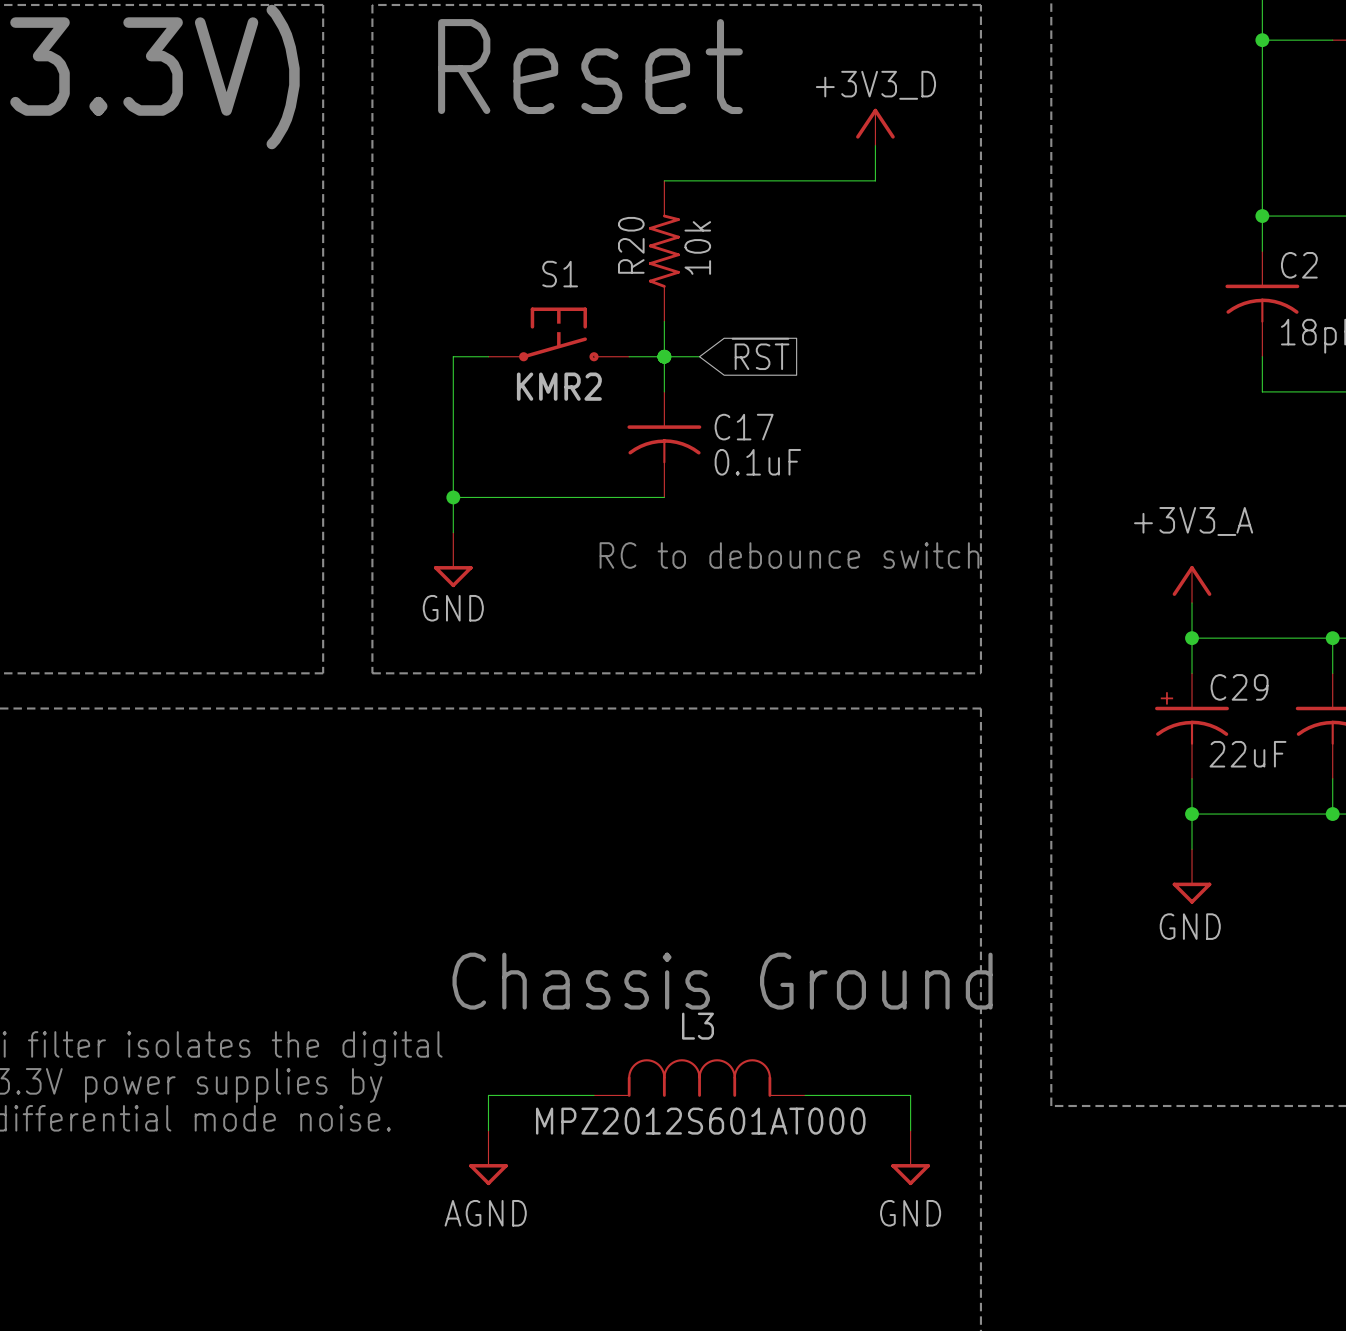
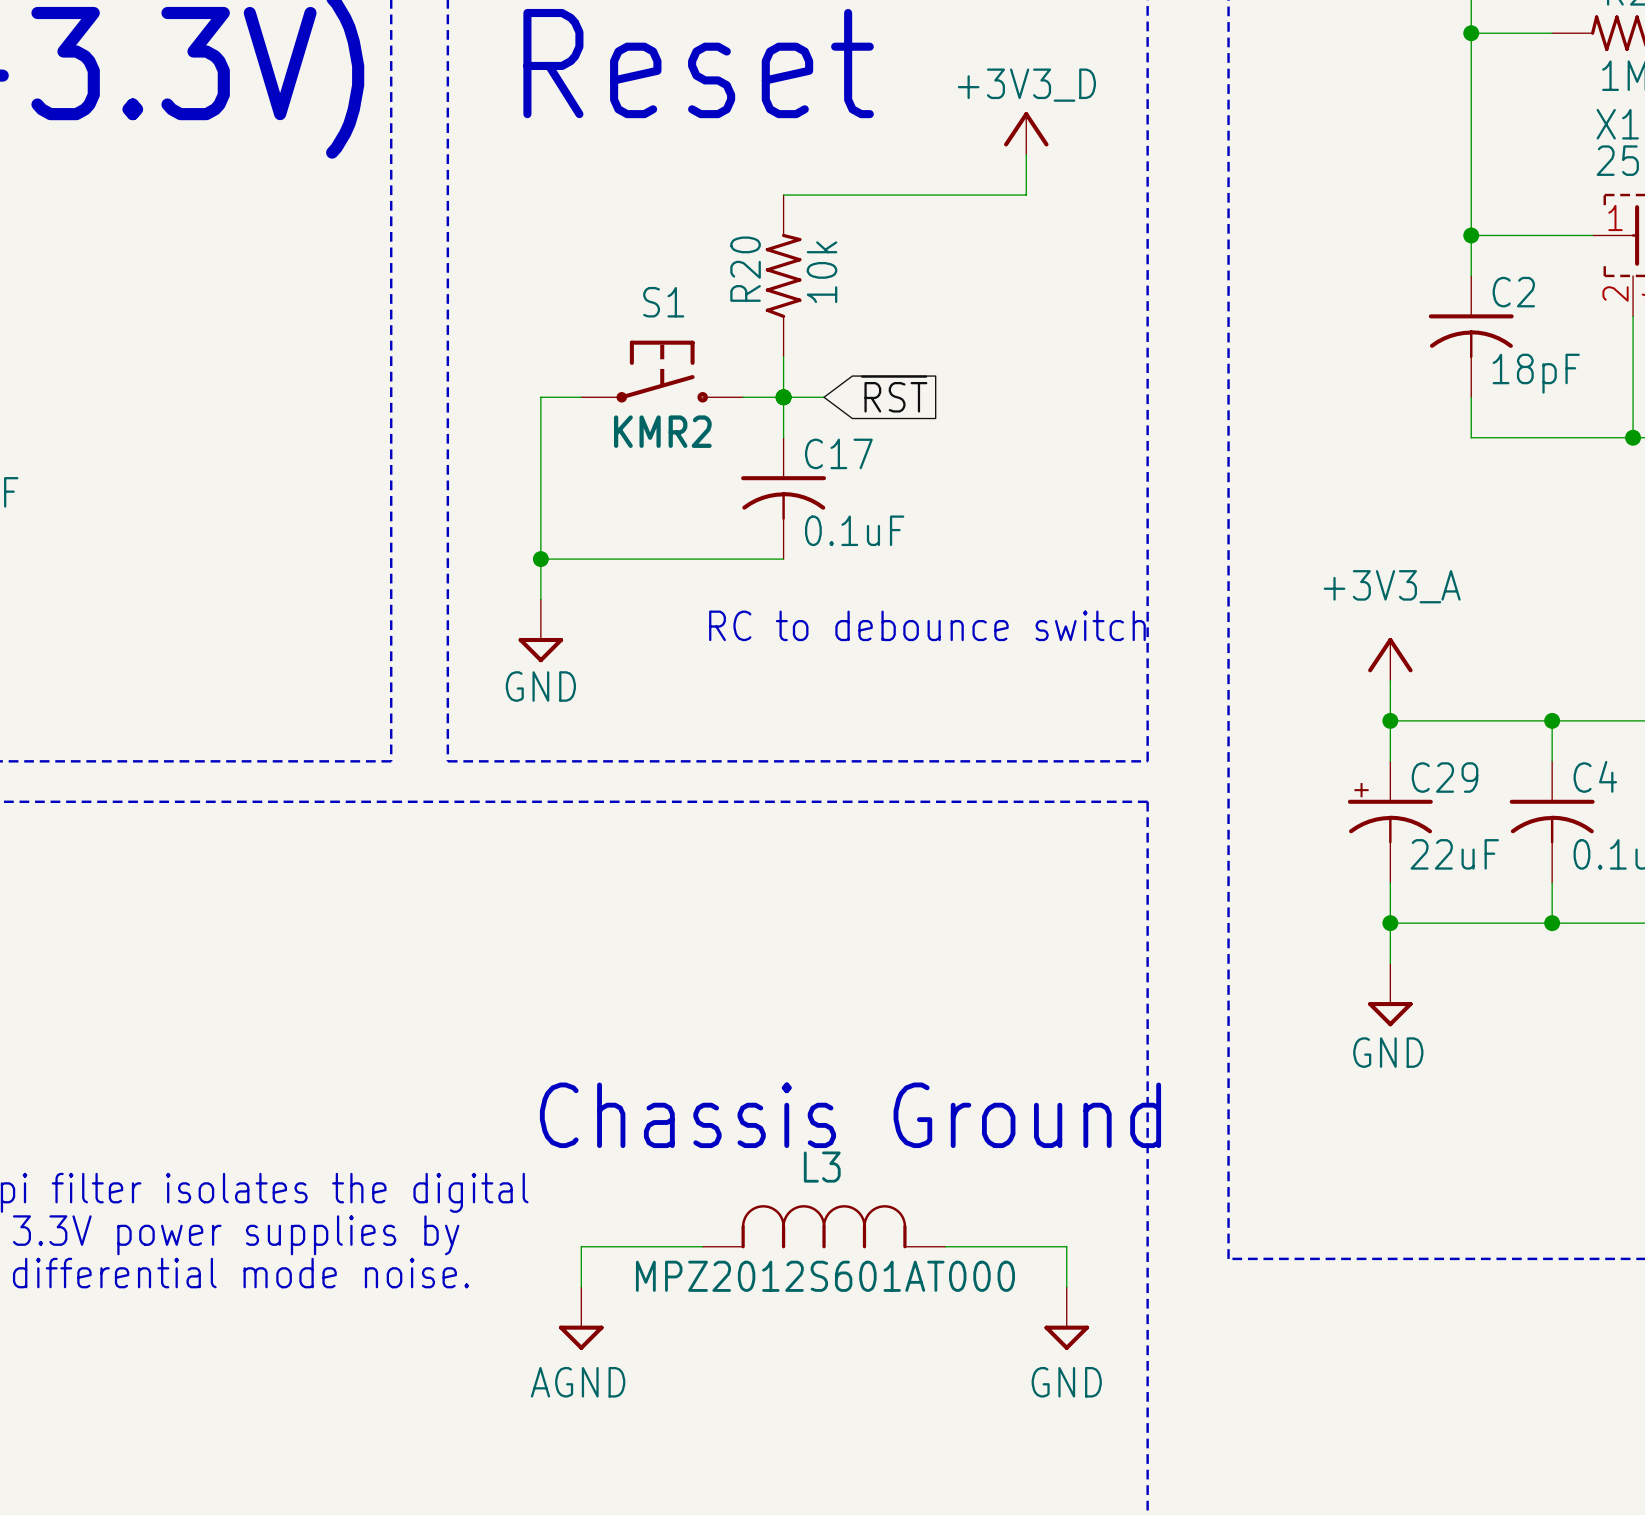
C17 name position: C17 (744, 427) -> C17 (838, 453)
C17 value position: 0.1uF (757, 462) -> 0.1uF (854, 530)

